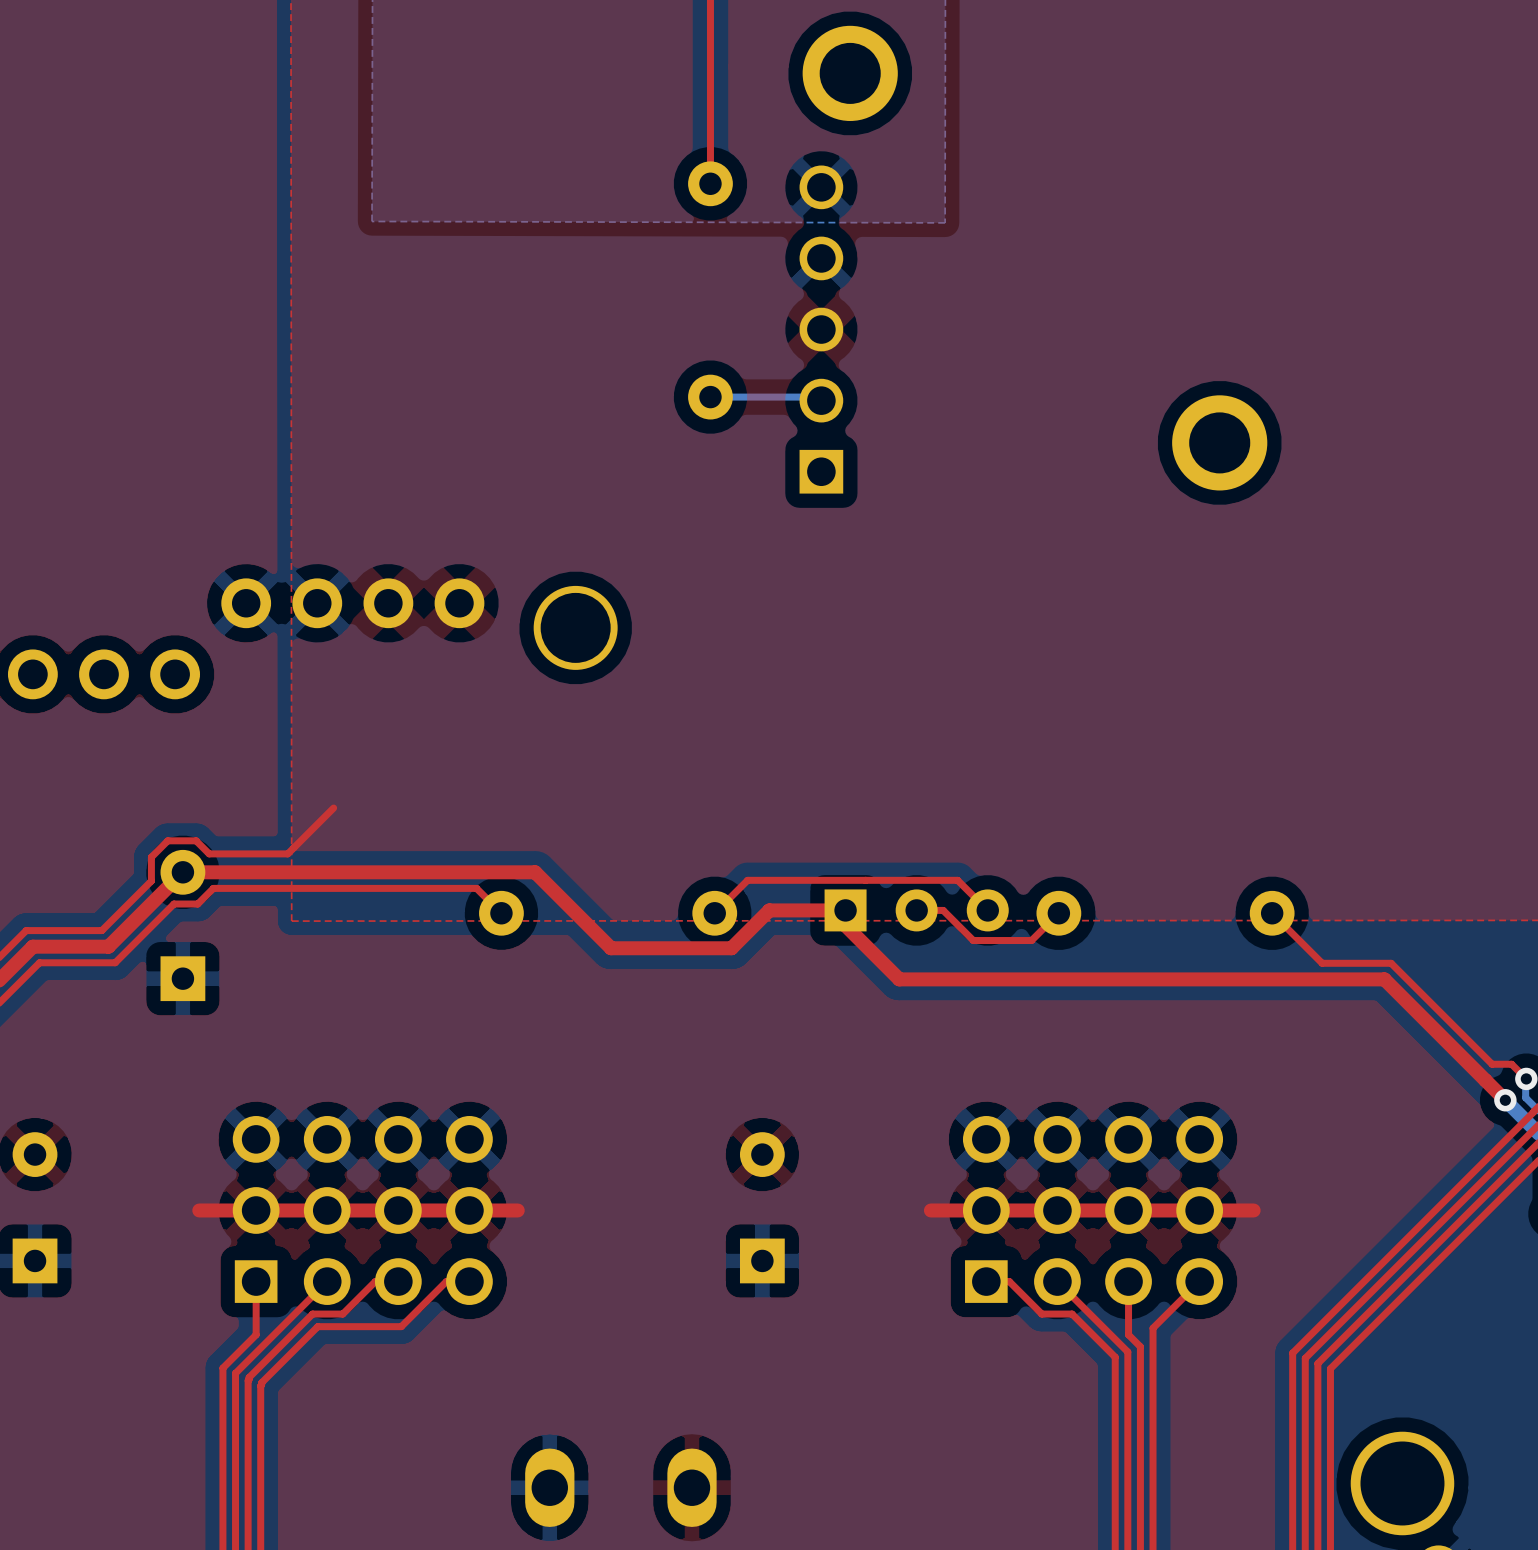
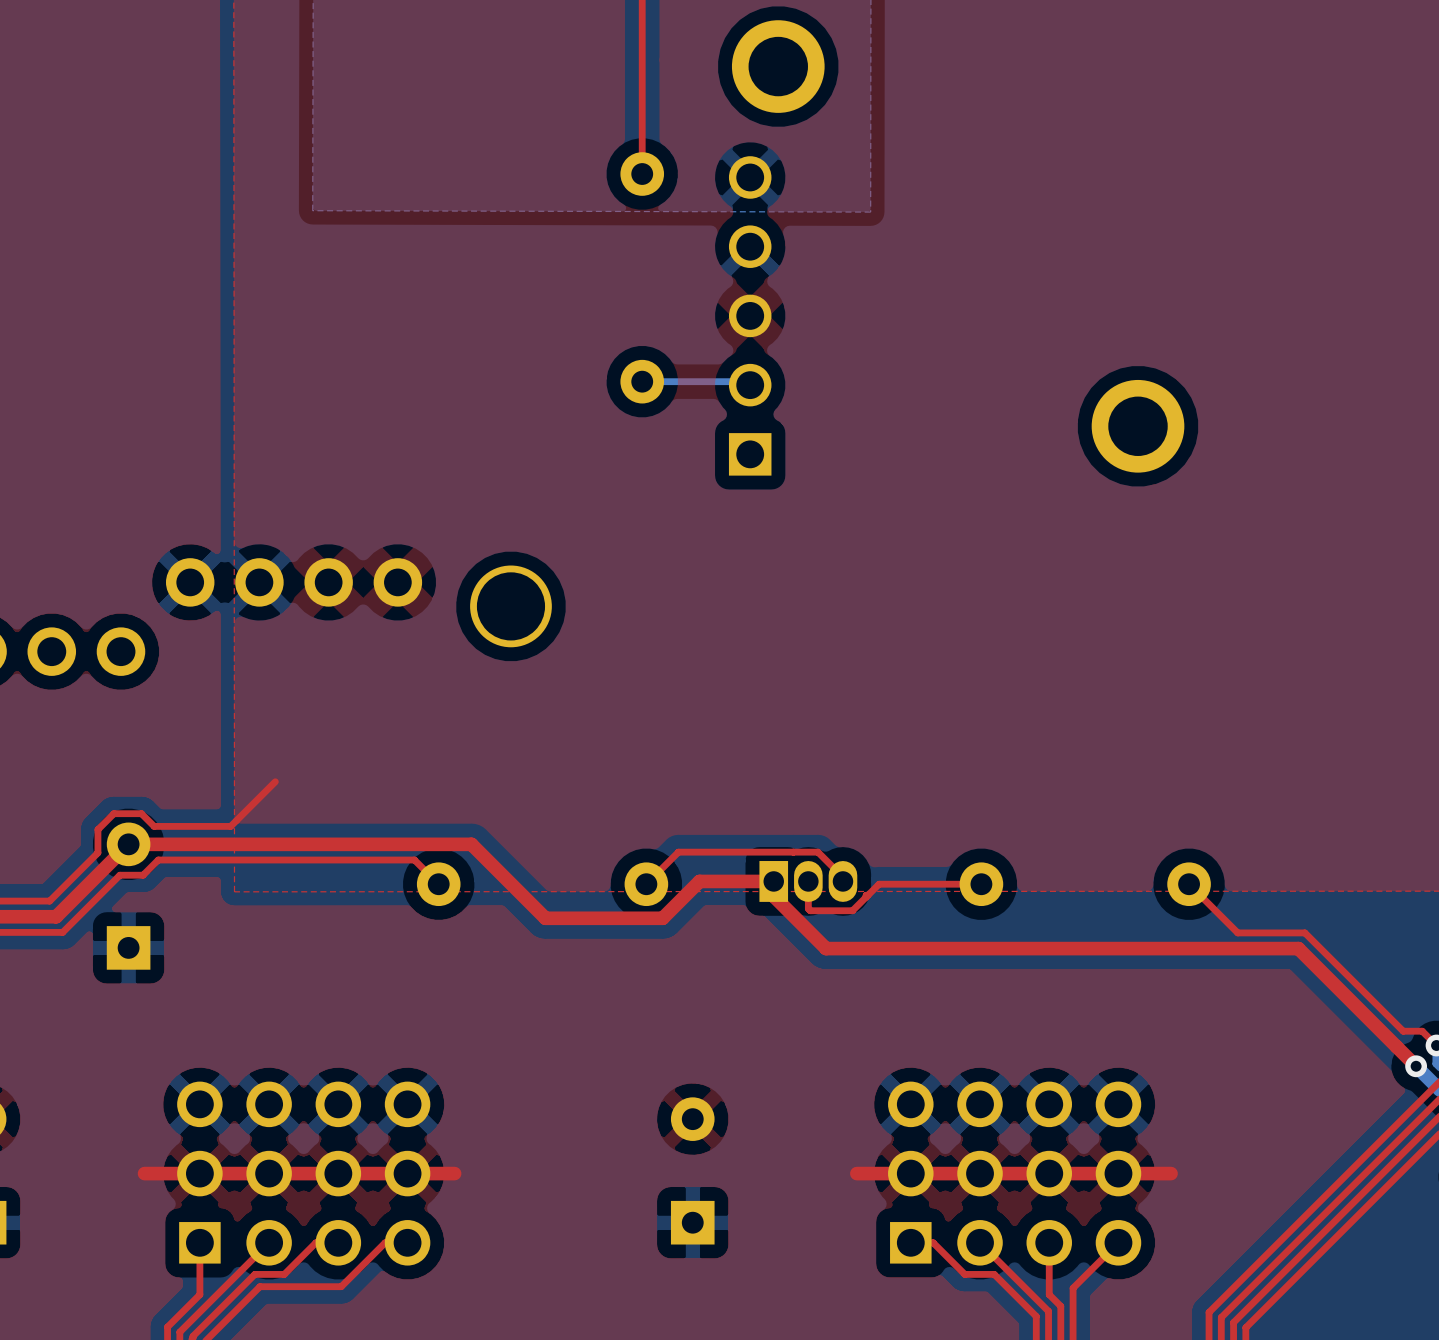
top track: (890, 880) (957, 880) (987, 910) -> (817, 852) (842, 877)
part: none -> (808, 881)
top track: (916, 910) (943, 910) (973, 940) (1031, 940) (1058, 913) -> (808, 881) (808, 908) (810, 910) (852, 910) (879, 884) (981, 884)
part: (916, 910) -> none

